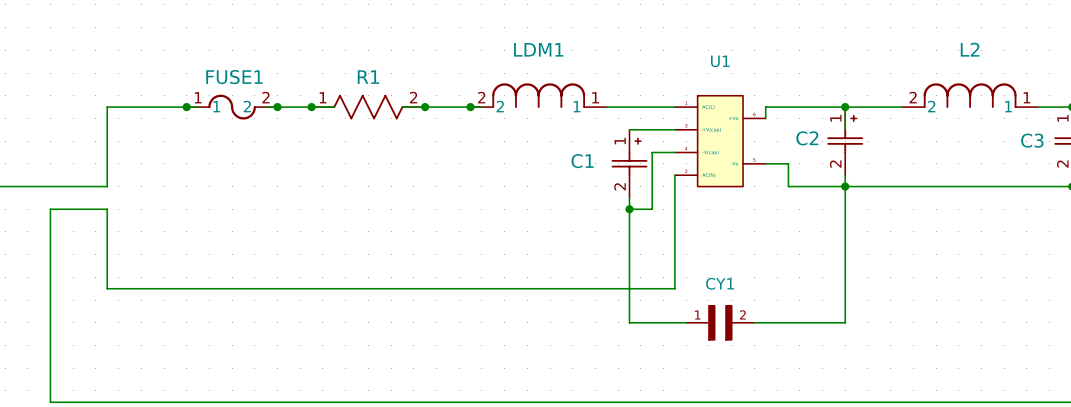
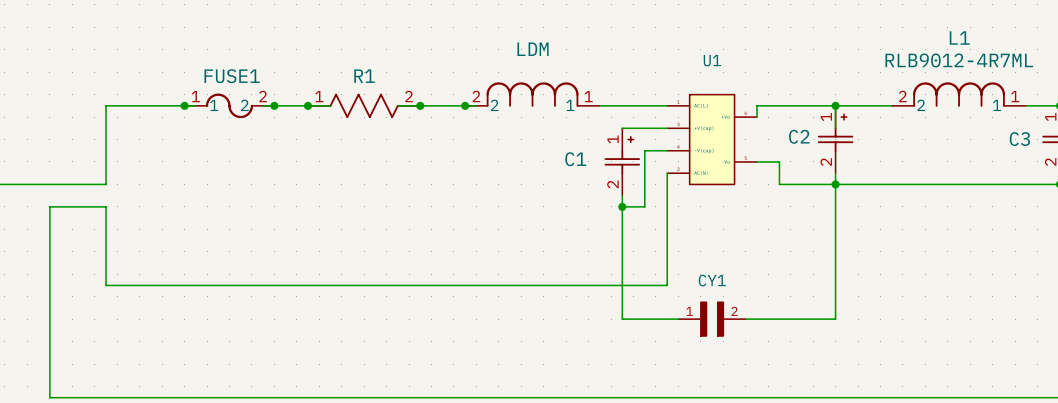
LDM1 name: LDM1 (538, 49) -> LDM (533, 49)
L2 name: L2 (970, 49) -> L1 (959, 38)
L2 value: none -> RLB9012-4R7ML (959, 60)

